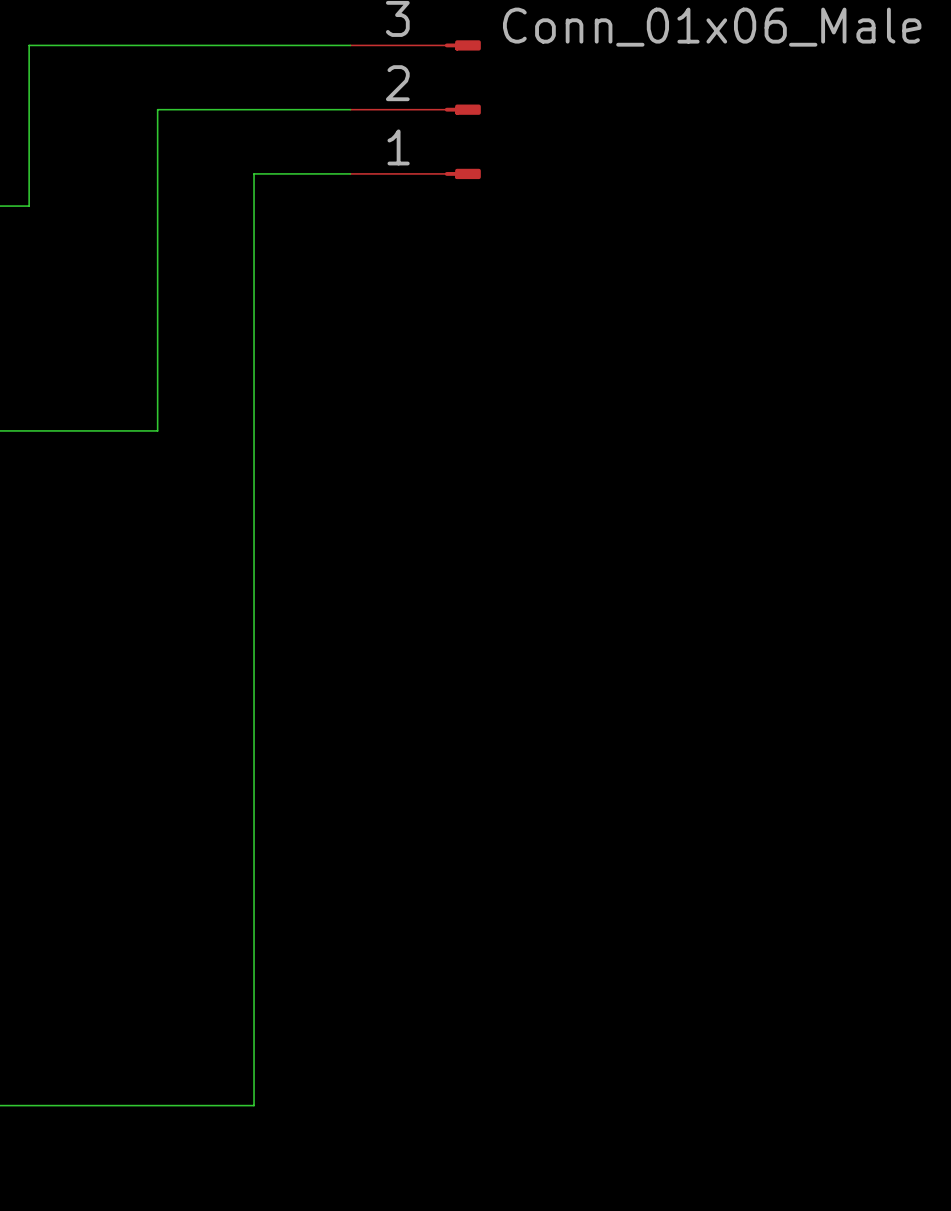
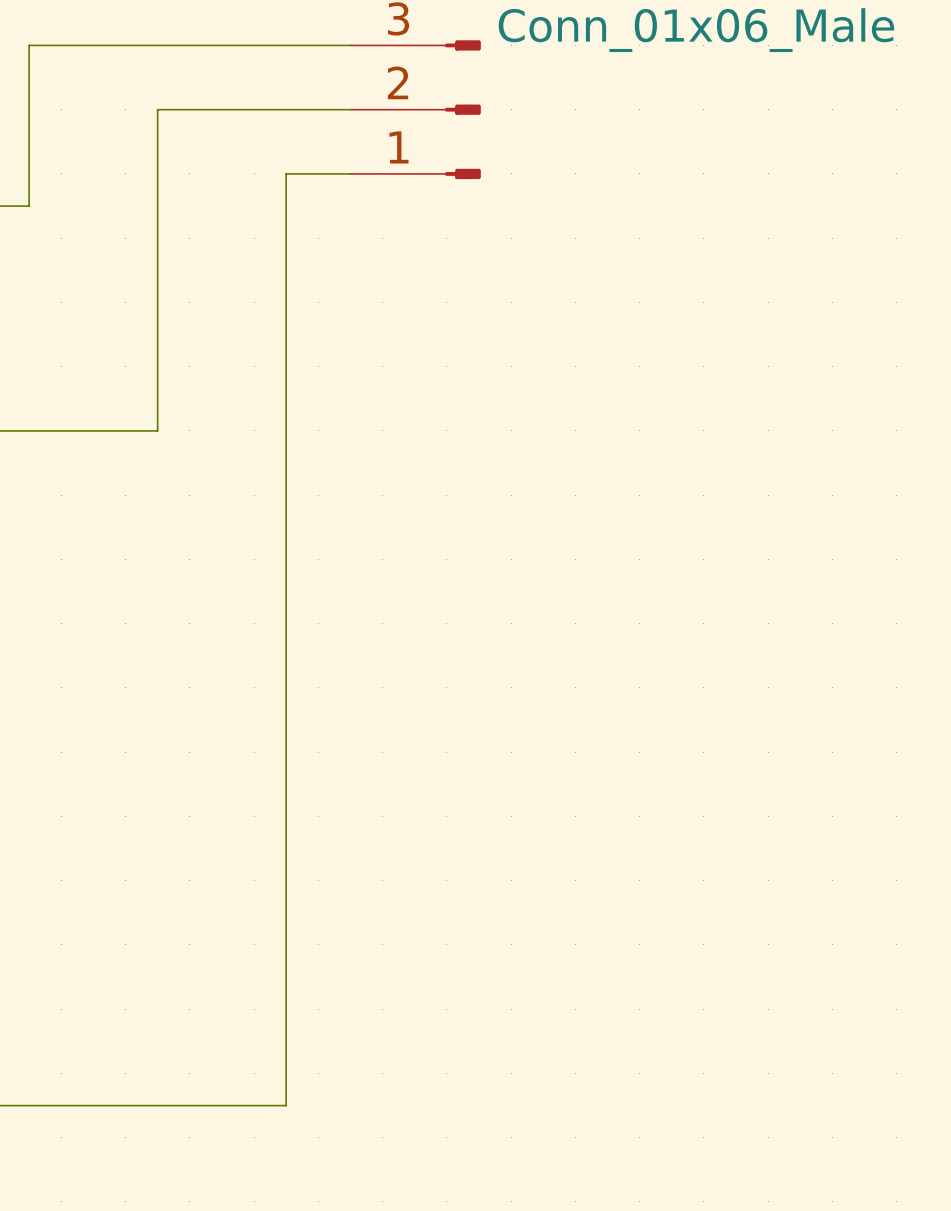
wire: (286, 173) (254, 173) (254, 1105) -> (286, 173) (286, 1105) (254, 1105)

